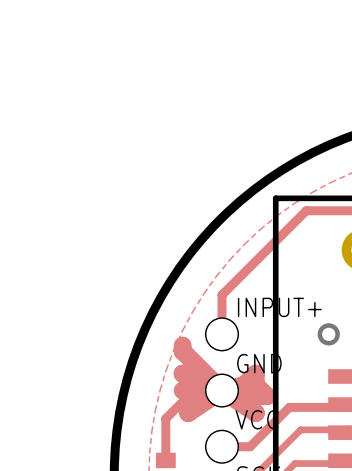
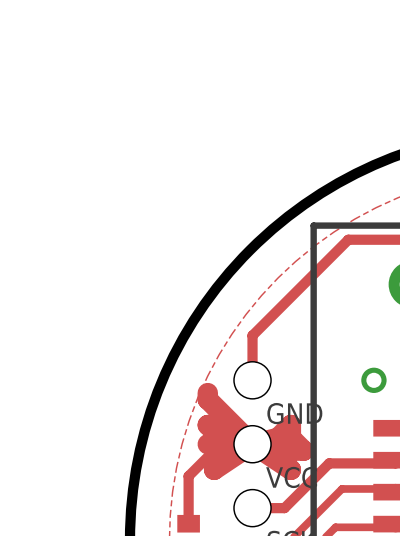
text: INPUT+ (279, 307) -> none

